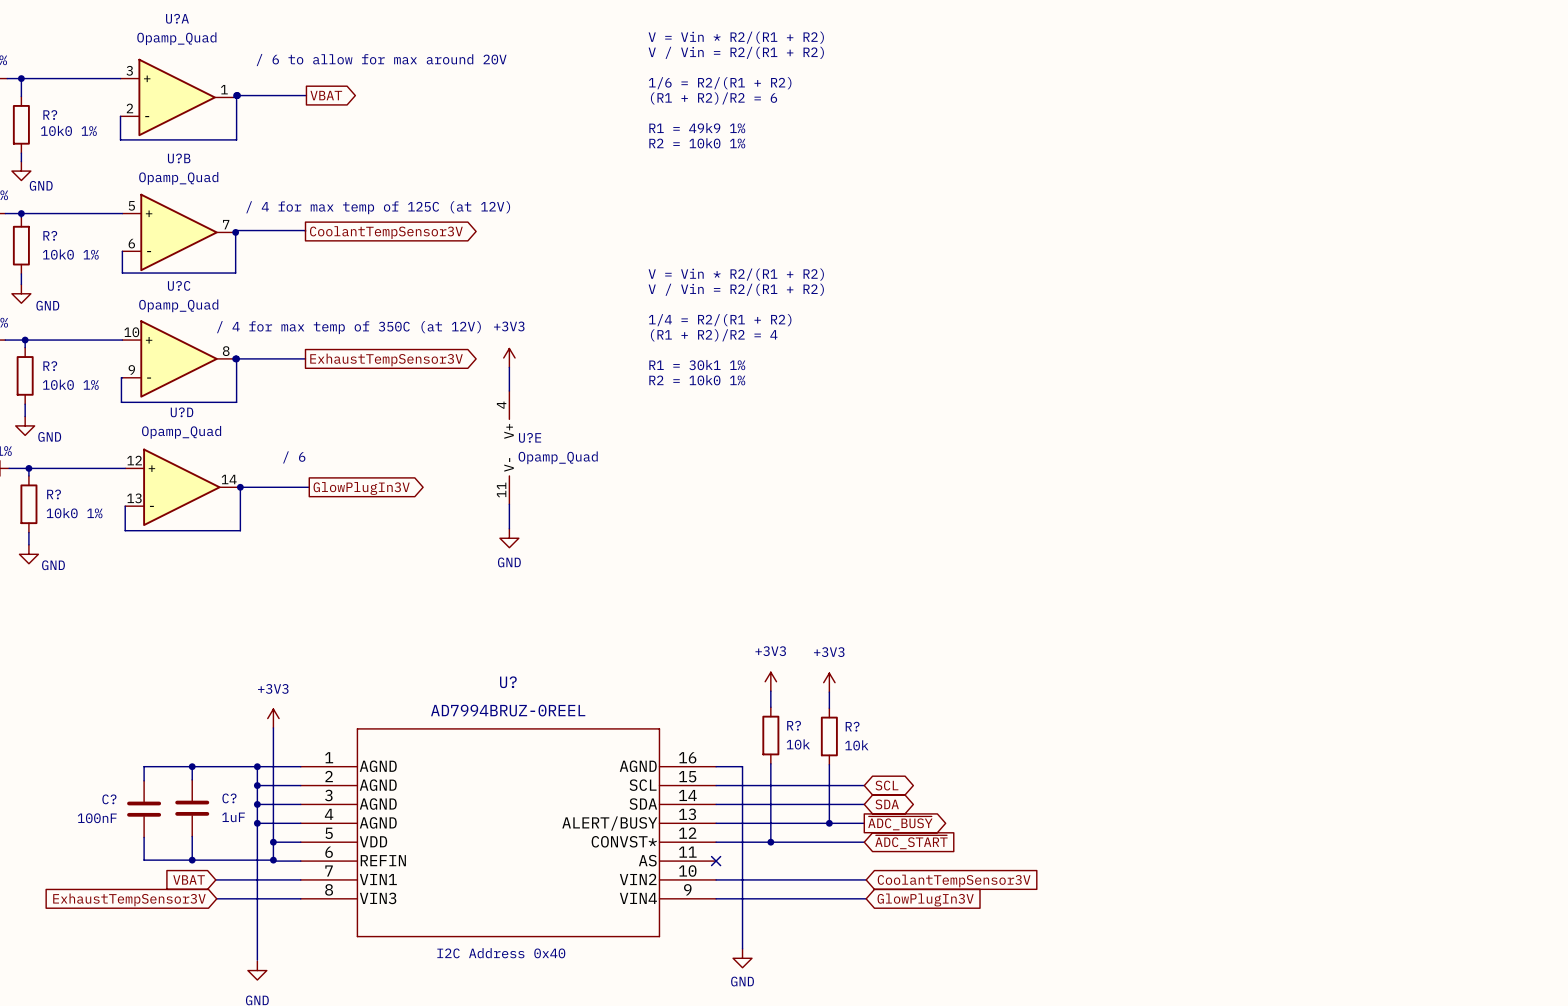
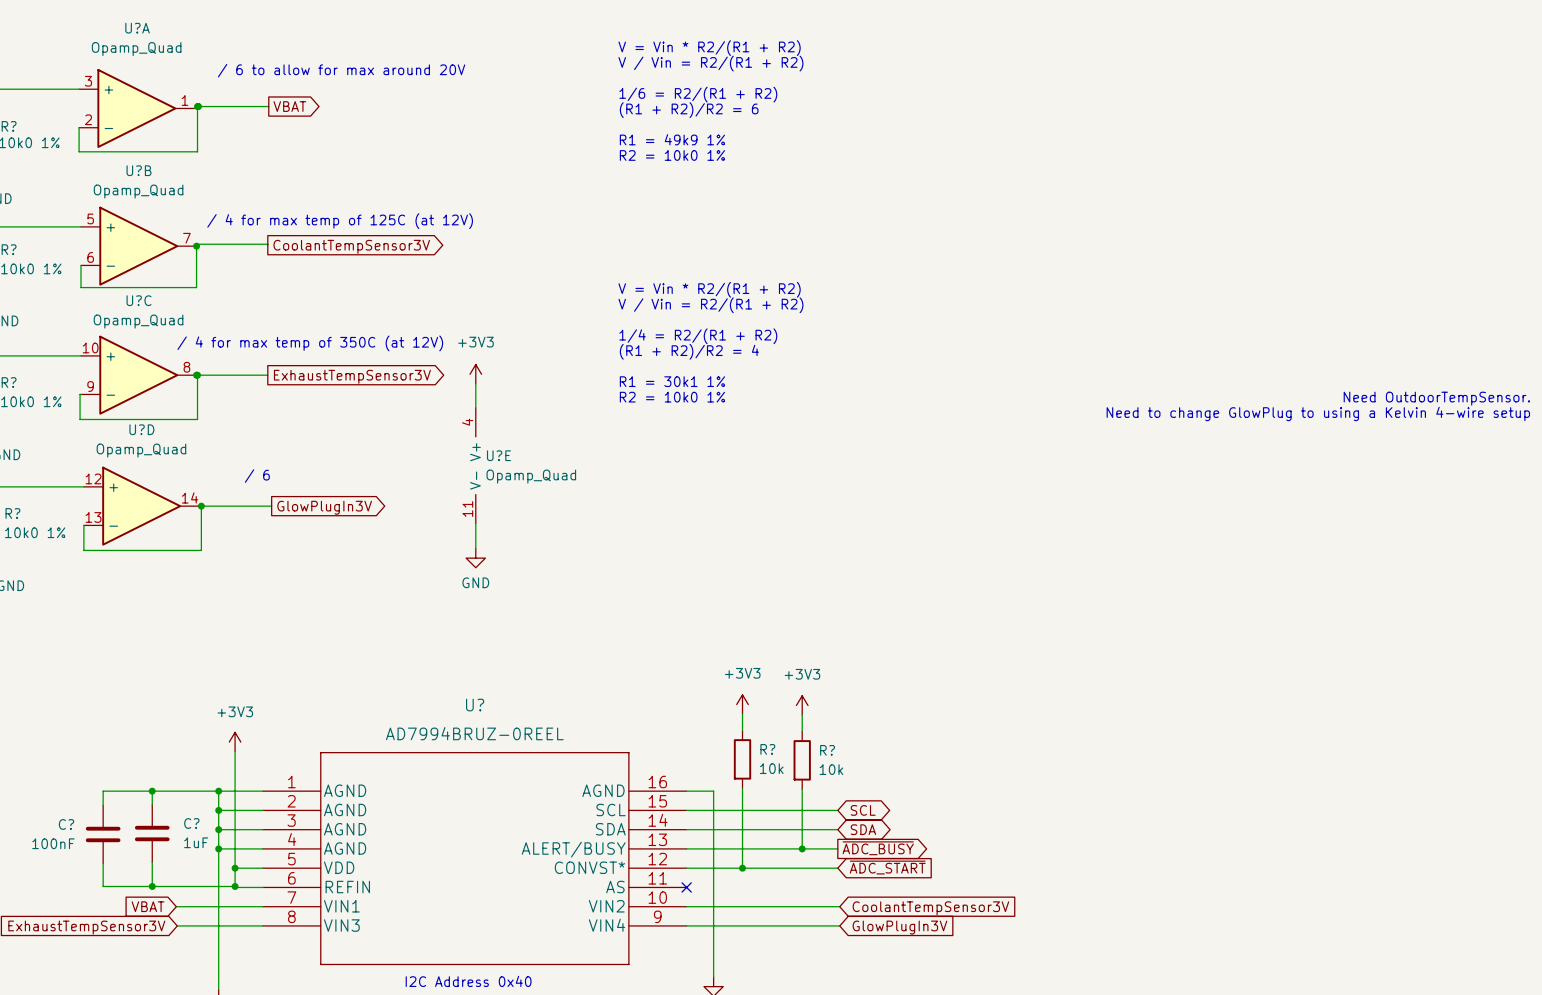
text: none -> Need OutdoorTempSensor. (1436, 398)
text: none -> Need to change GlowPlug to using a Kelvin 4-wire setup (1318, 413)

